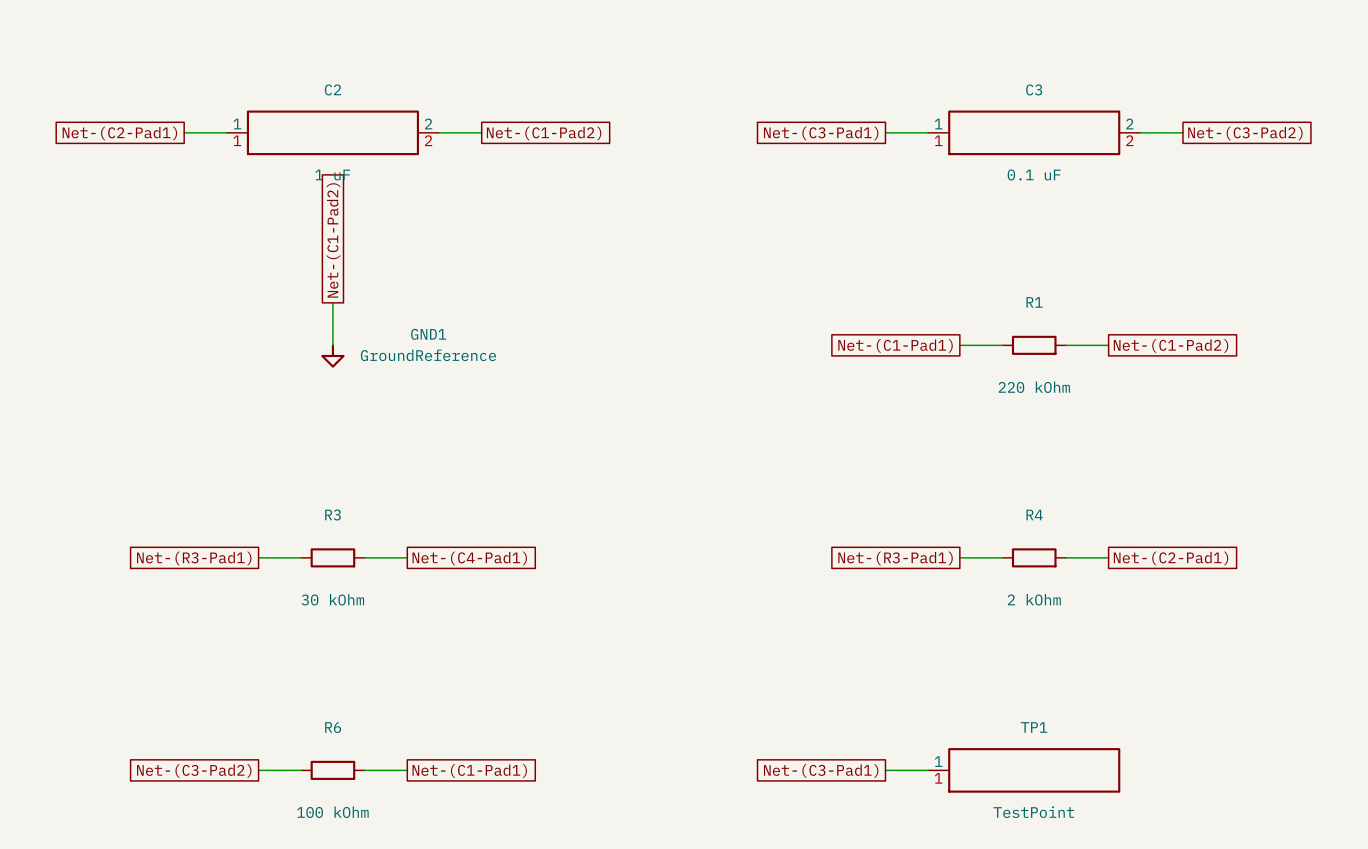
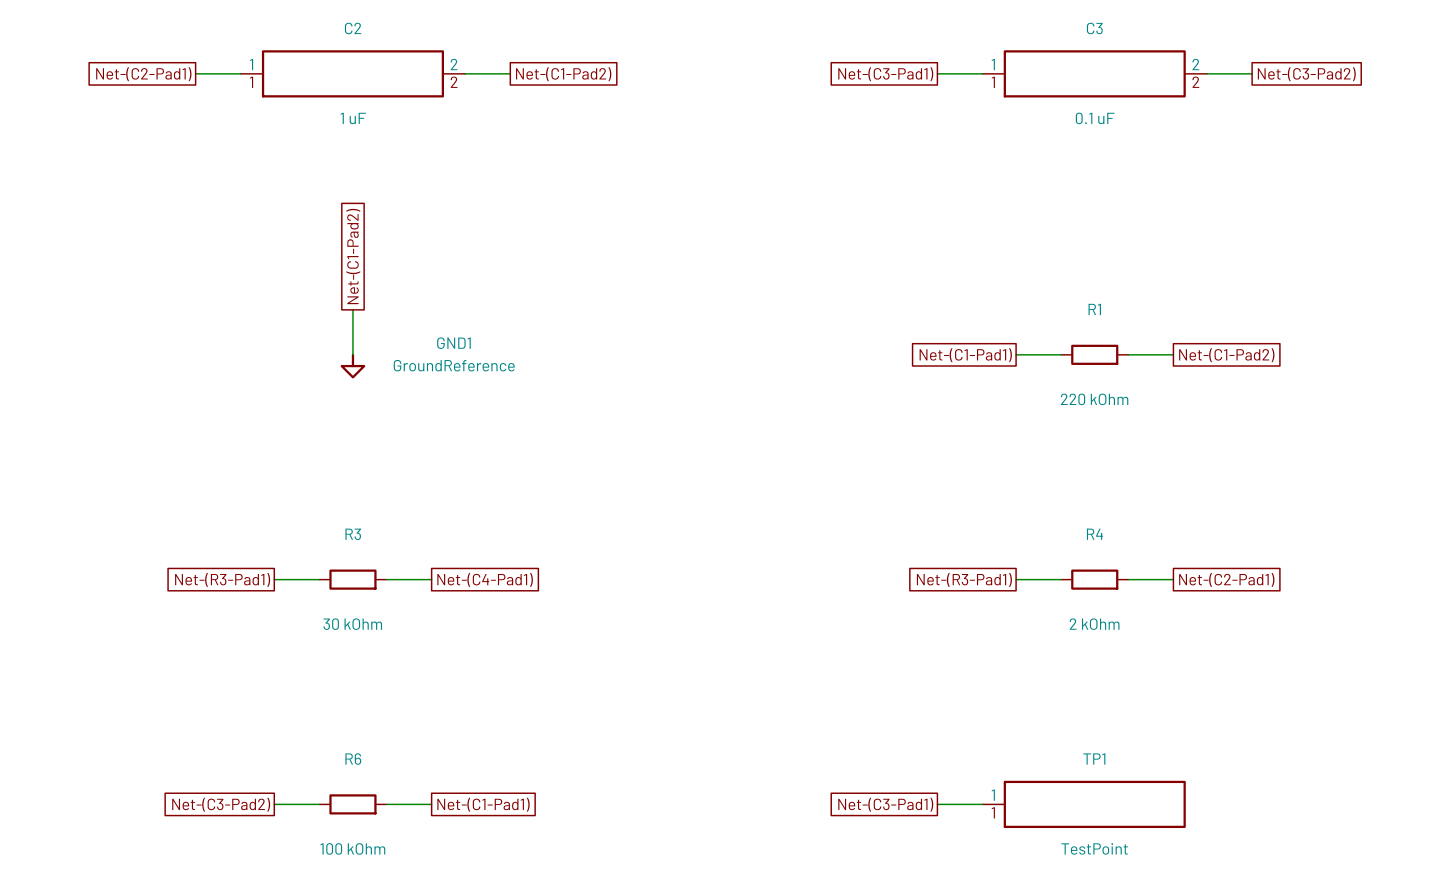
wire: (184, 132) (226, 132) -> (195, 73) (240, 73)
C2 position: (332, 132) -> (352, 73)
wire: (439, 132) (481, 132) -> (465, 73) (510, 73)
wire: (885, 132) (927, 132) -> (937, 73) (982, 73)
C3 position: (1034, 132) -> (1094, 73)
wire: (1140, 132) (1182, 132) -> (1207, 73) (1252, 73)
global label position: Net-(C2-Pad1) (119, 133) -> Net-(C2-Pad1) (143, 74)
global label position: Net-(C1-Pad2) (544, 133) -> Net-(C1-Pad2) (563, 74)
global label position: Net-(C3-Pad1) (821, 133) -> Net-(C3-Pad1) (885, 74)
global label position: Net-(C3-Pad2) (1245, 133) -> Net-(C3-Pad2) (1306, 74)

